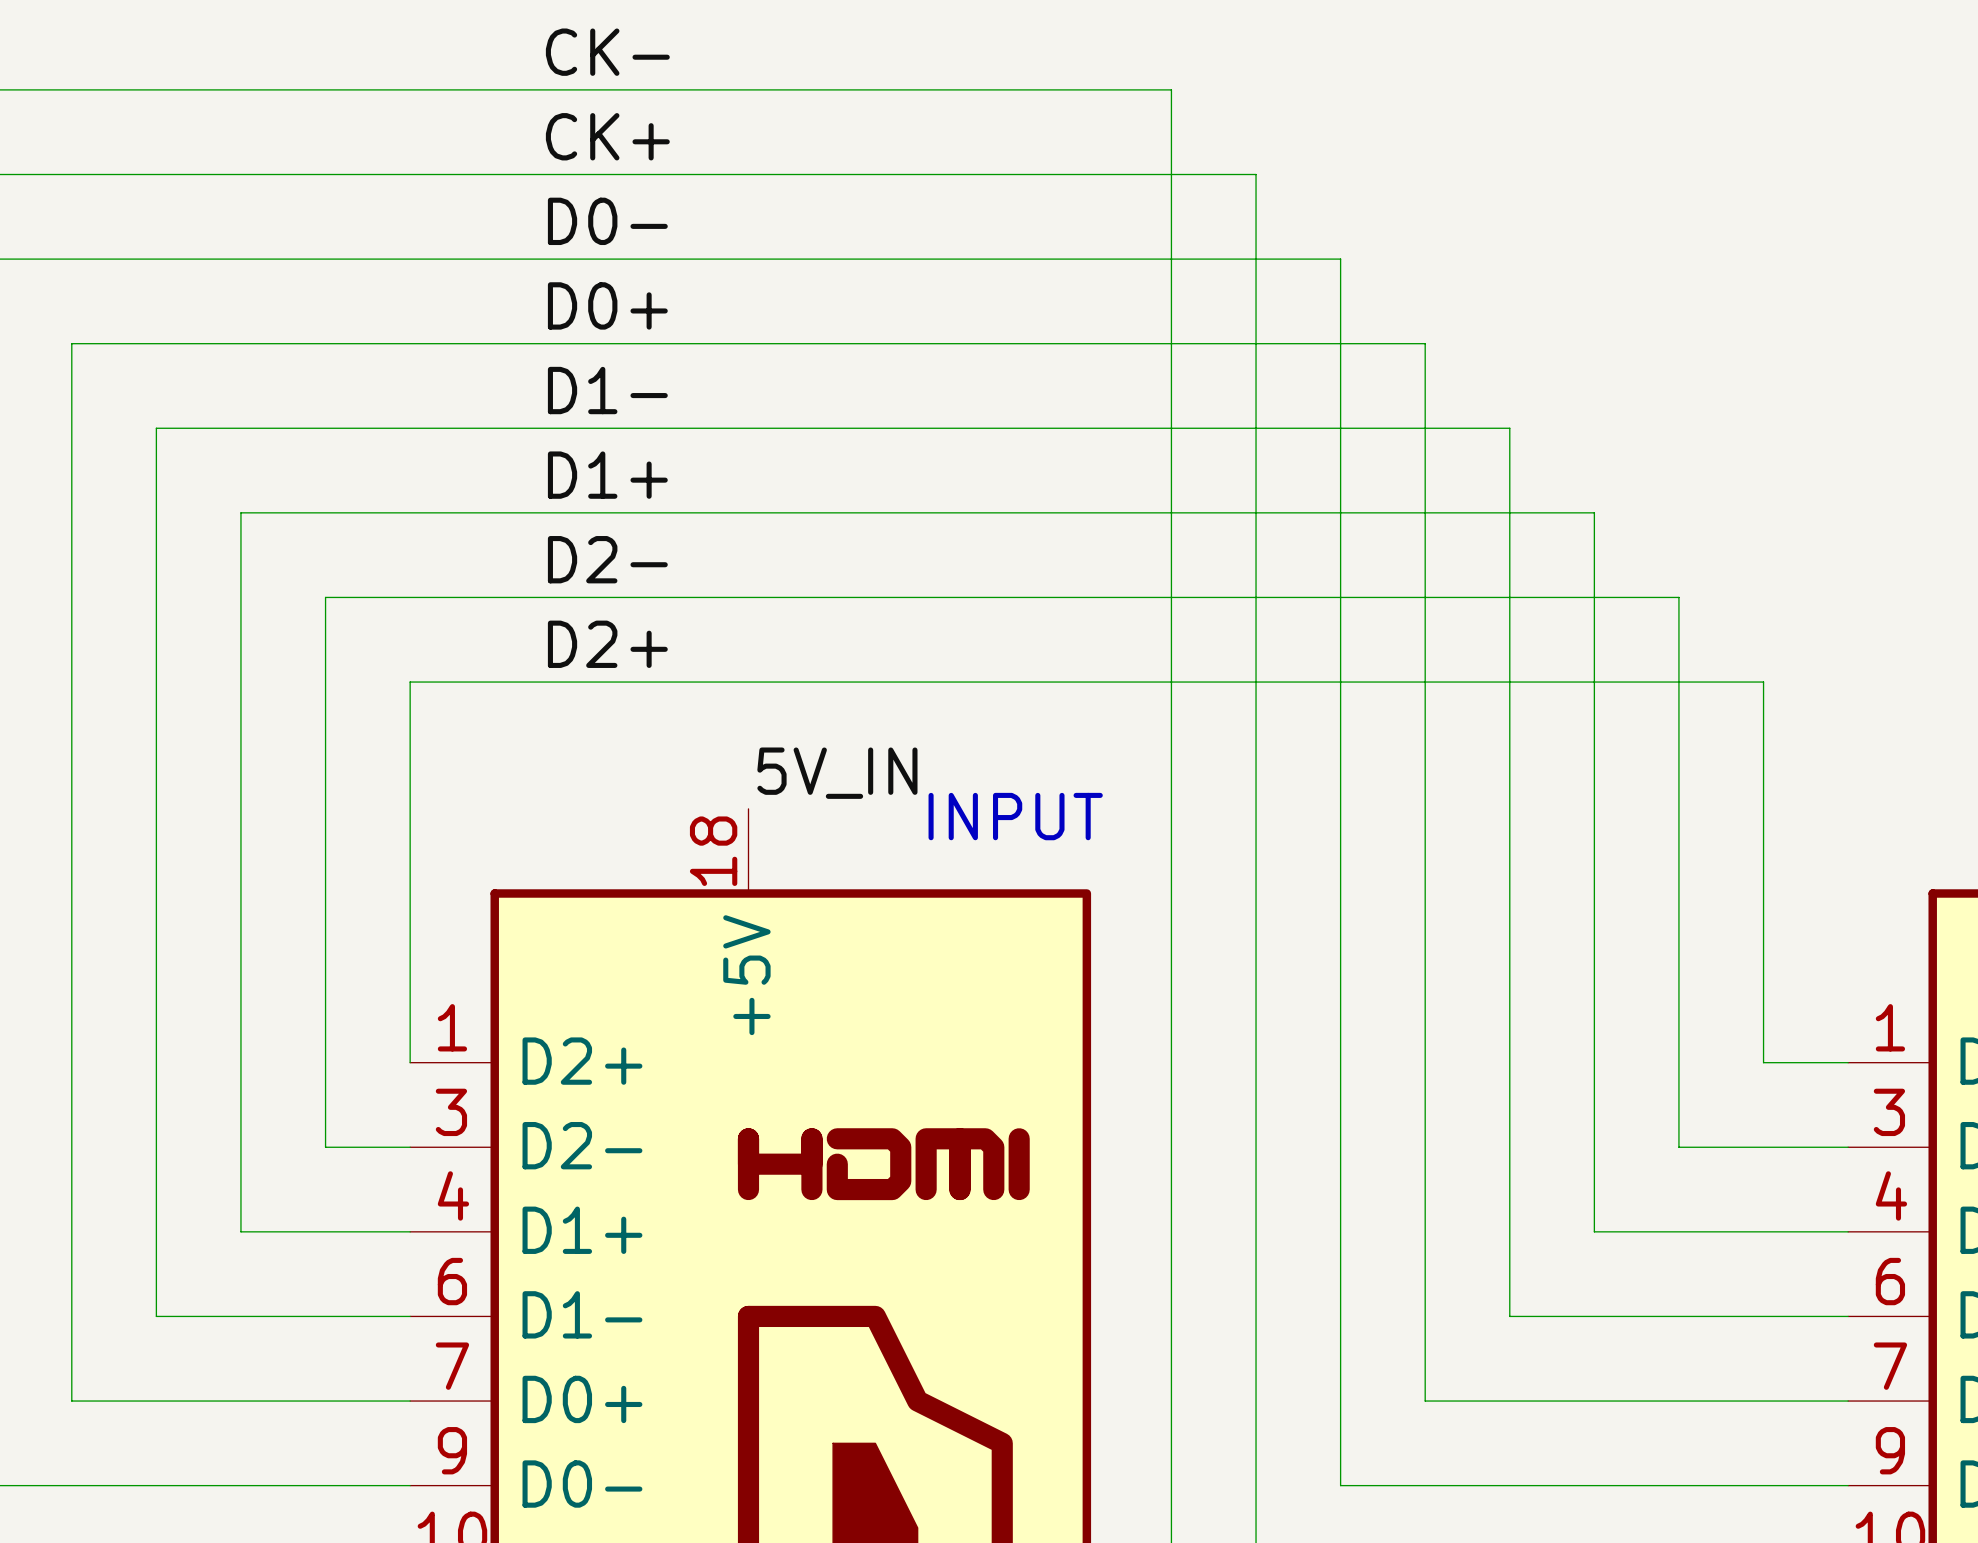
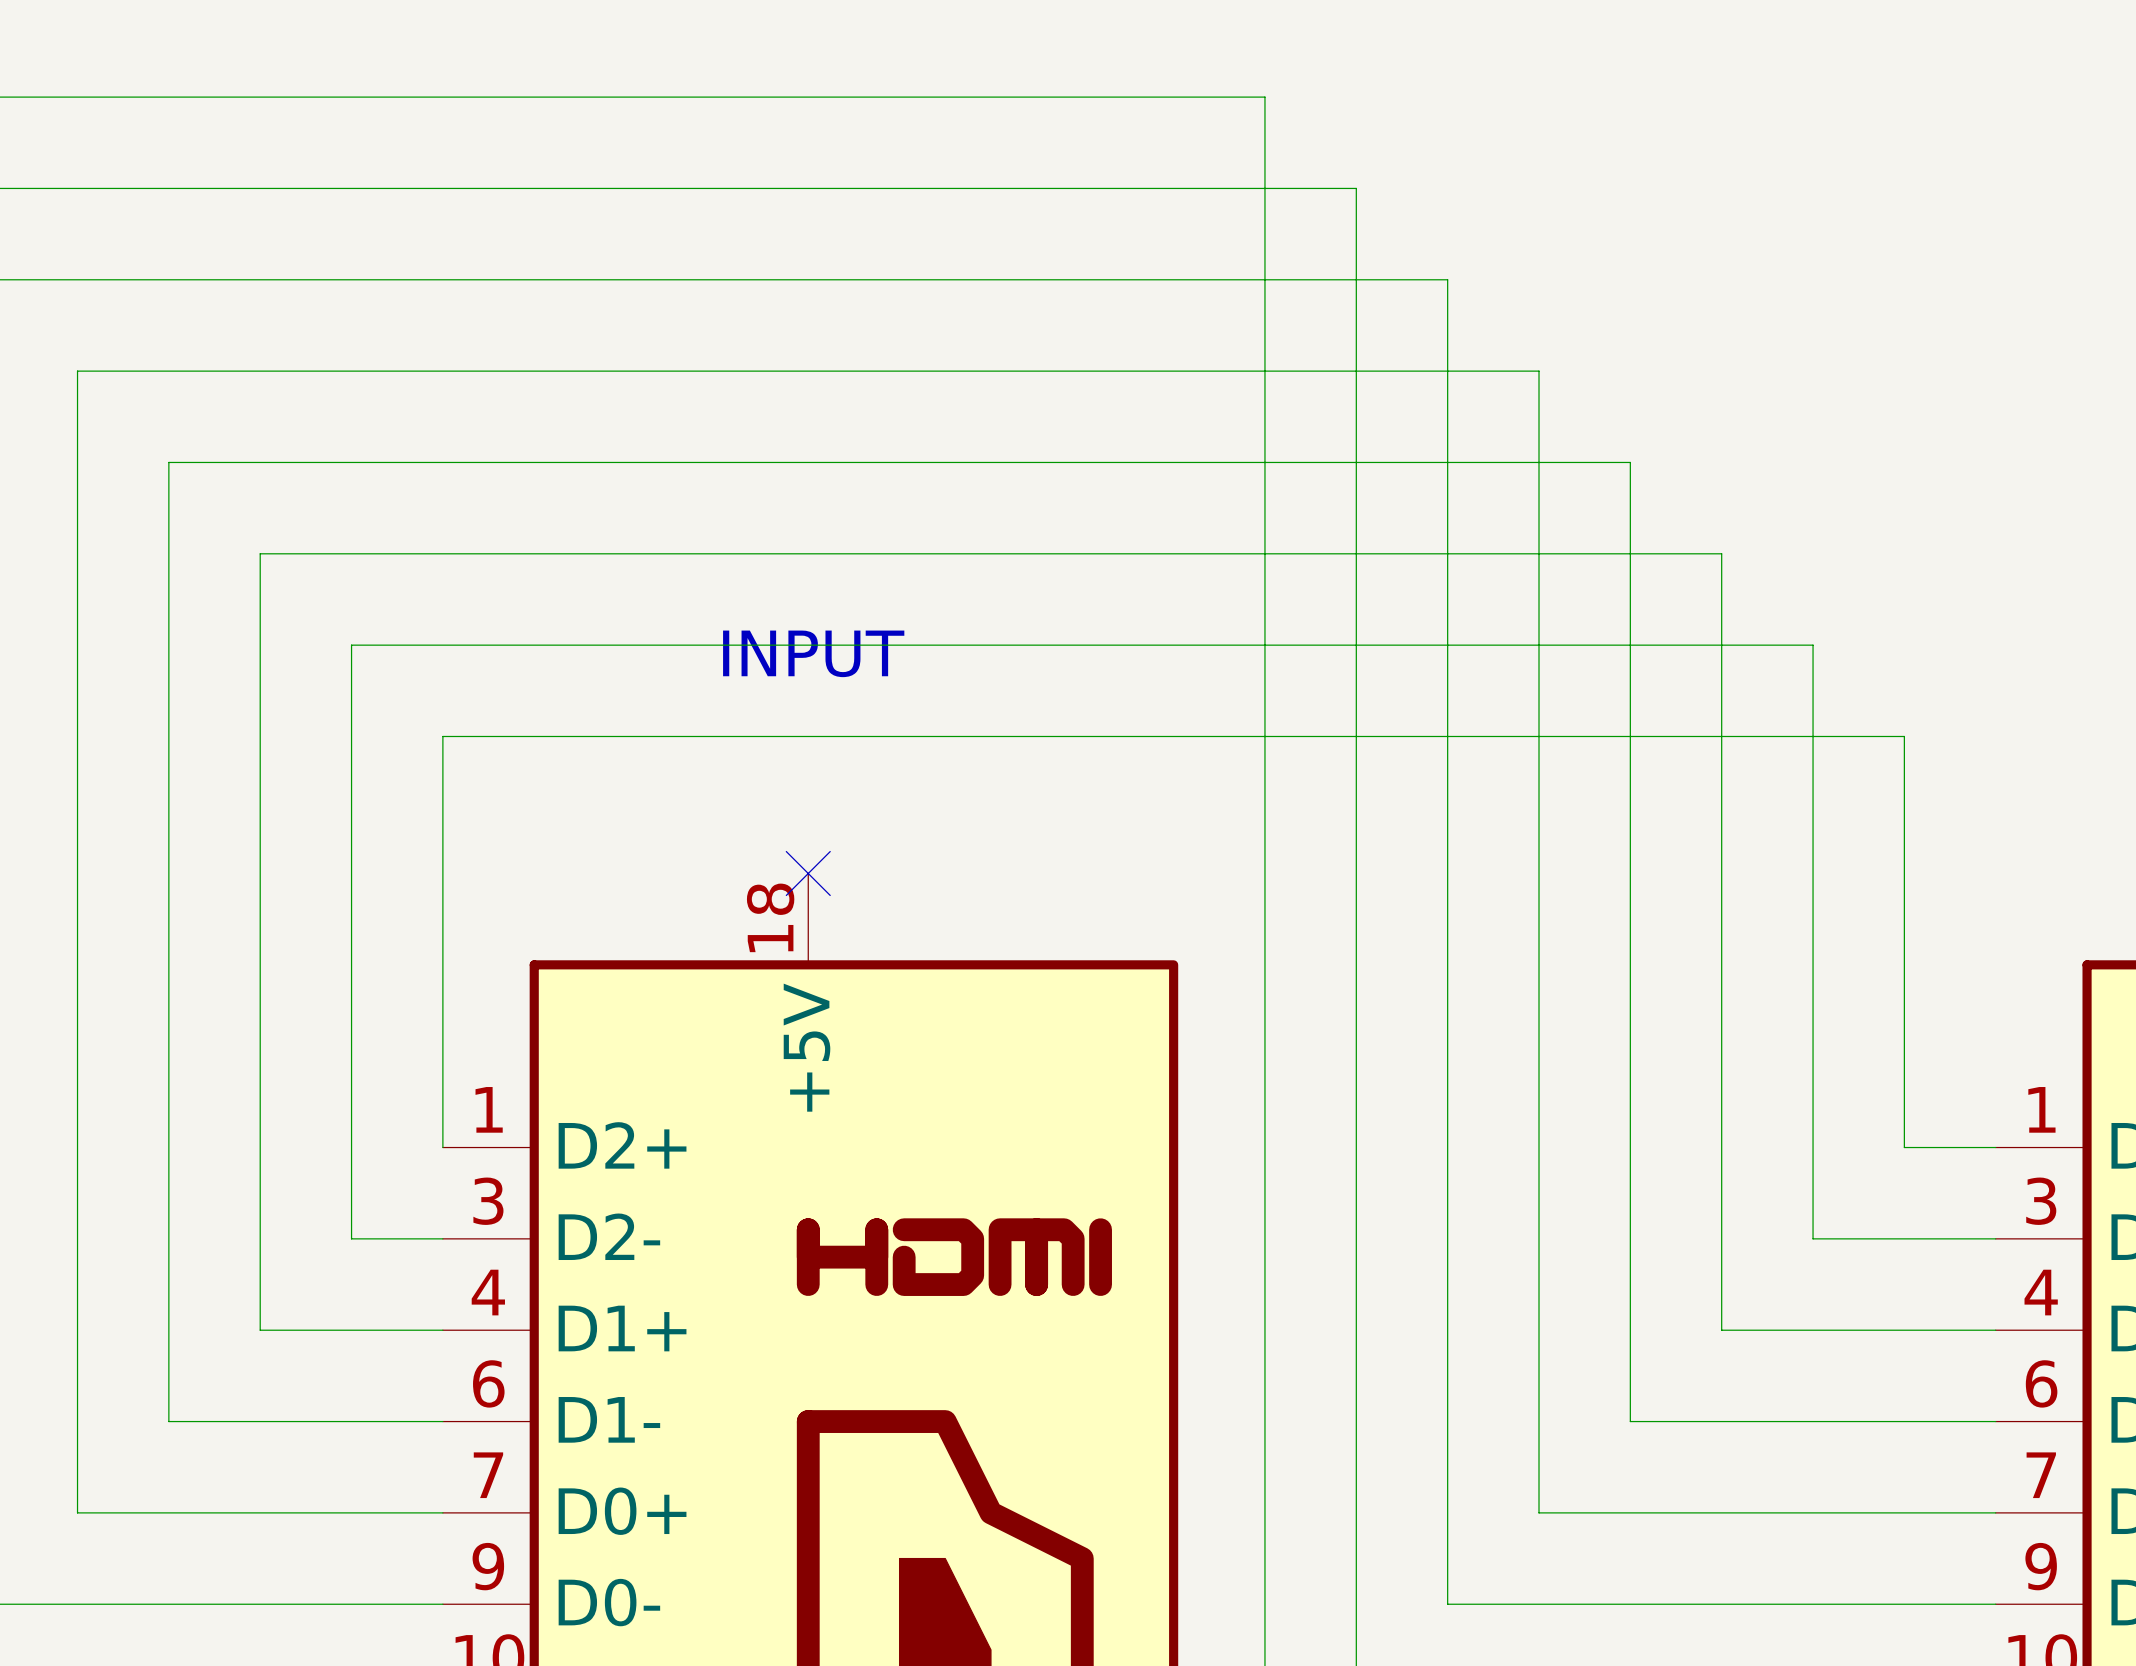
label: CK- (607, 52) -> none
label: CK+ (607, 136) -> none
label: D0- (607, 221) -> none
label: D0+ (607, 305) -> none
label: D1- (607, 390) -> none
label: D1+ (607, 475) -> none
label: D2- (607, 559) -> none
label: D2+ (607, 644) -> none
label: 5V_IN (837, 773) -> none
no-connect mark: none -> (808, 873)
text position: INPUT (1015, 816) -> INPUT (813, 653)

